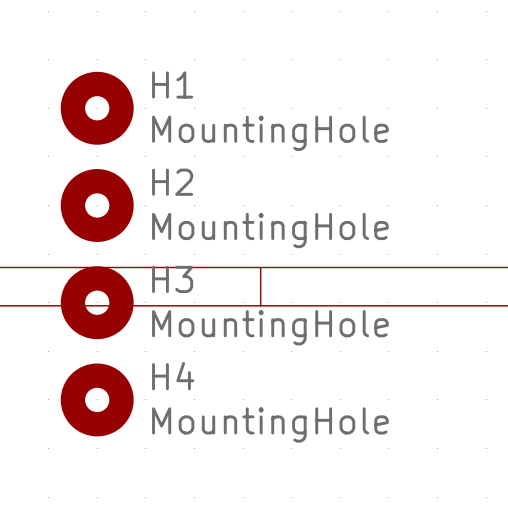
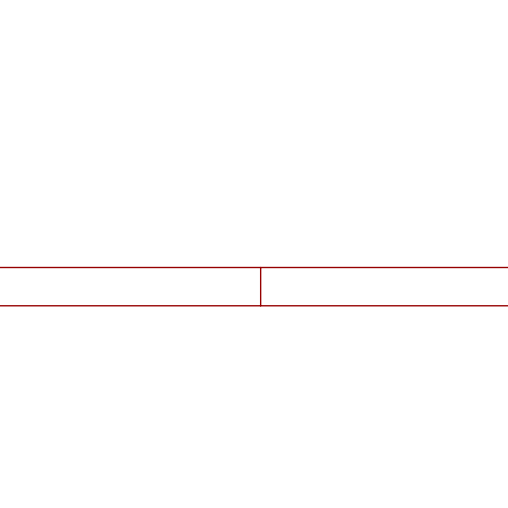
H1: MountingHole (97, 108) -> none
H2: MountingHole (97, 205) -> none
H3: MountingHole (97, 302) -> none
H4: MountingHole (97, 399) -> none

